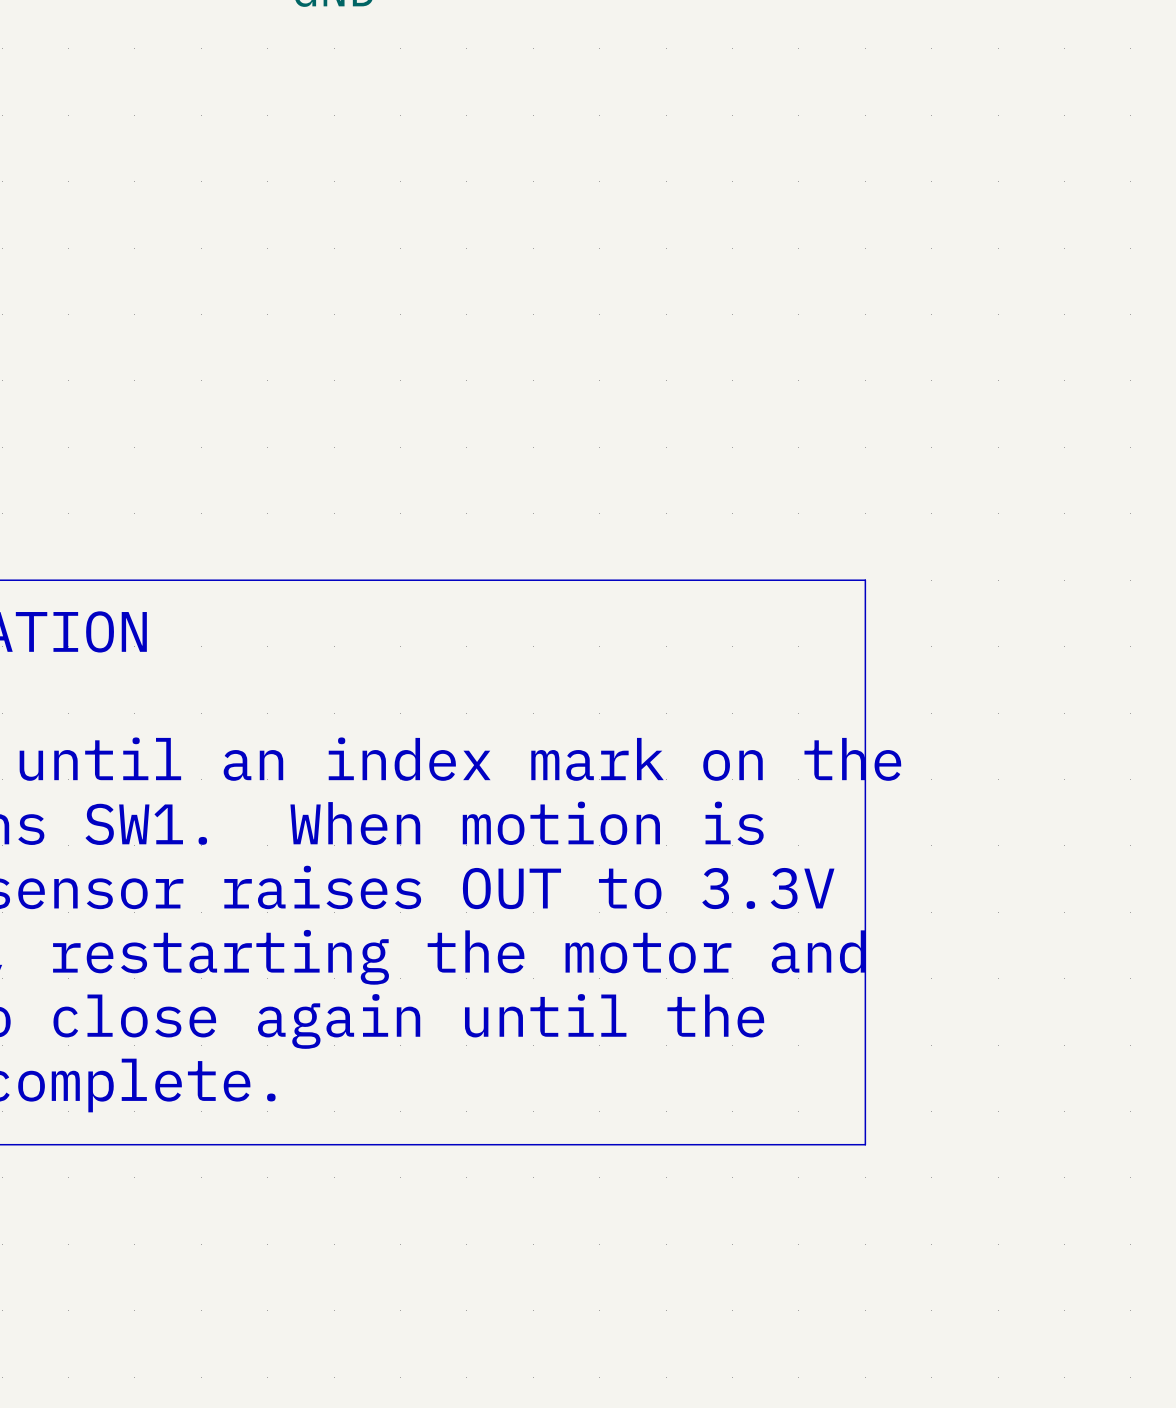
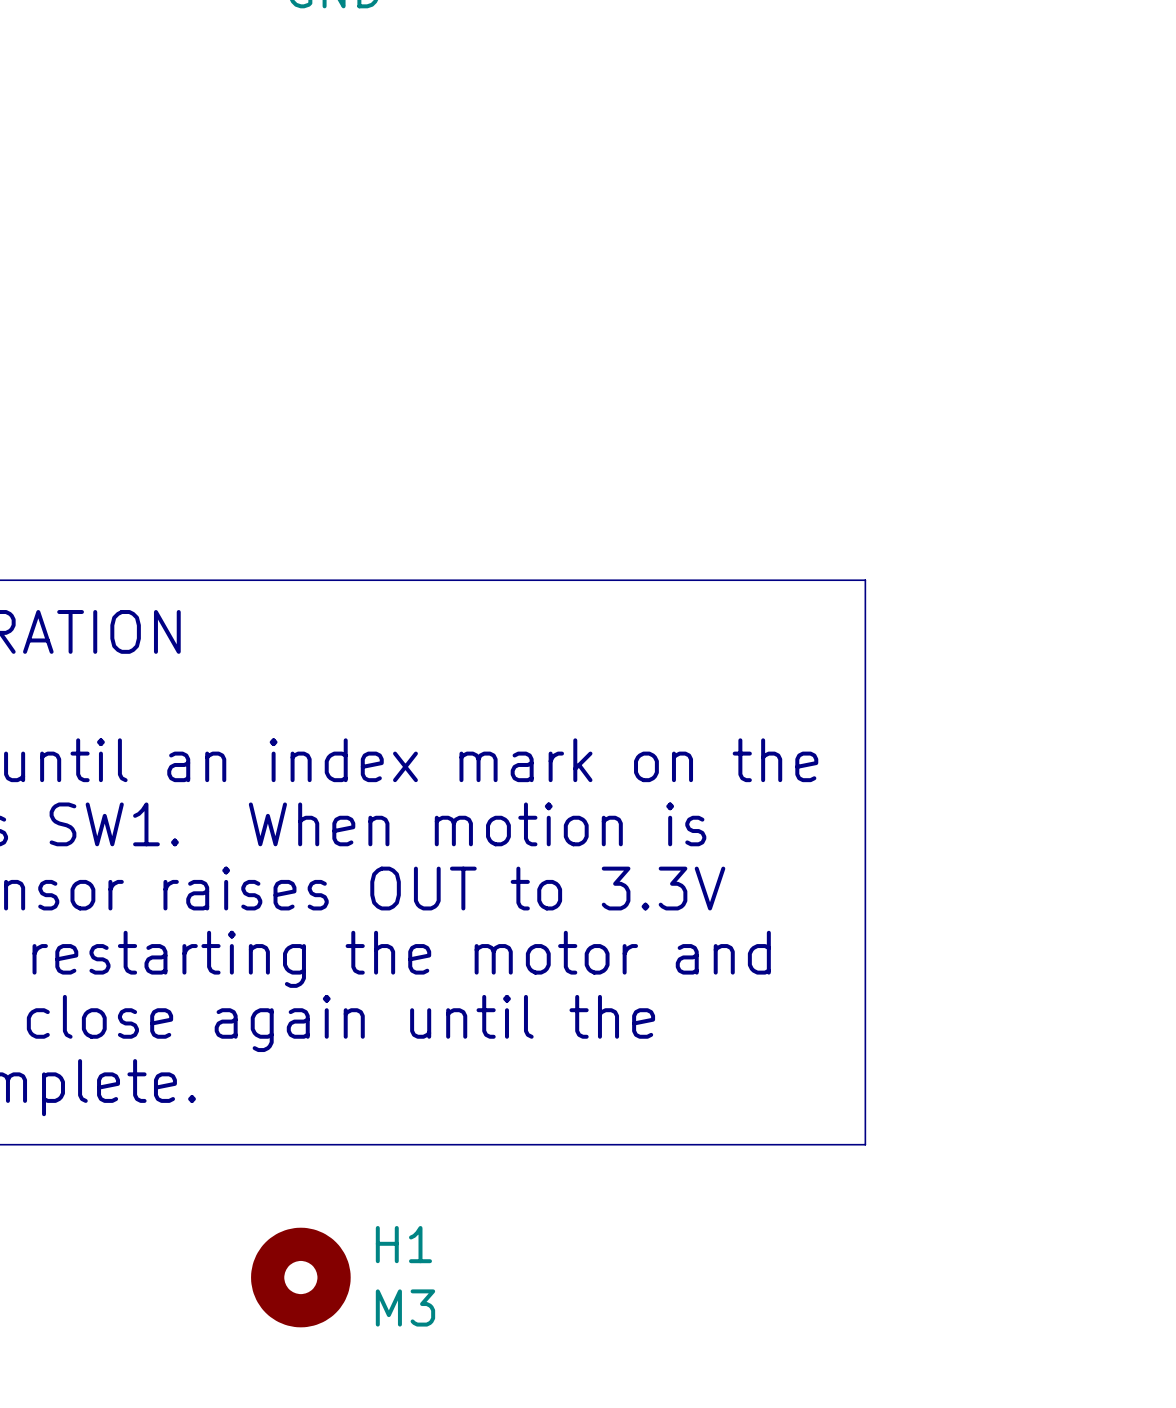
H1: none -> M3 (300, 1277)

